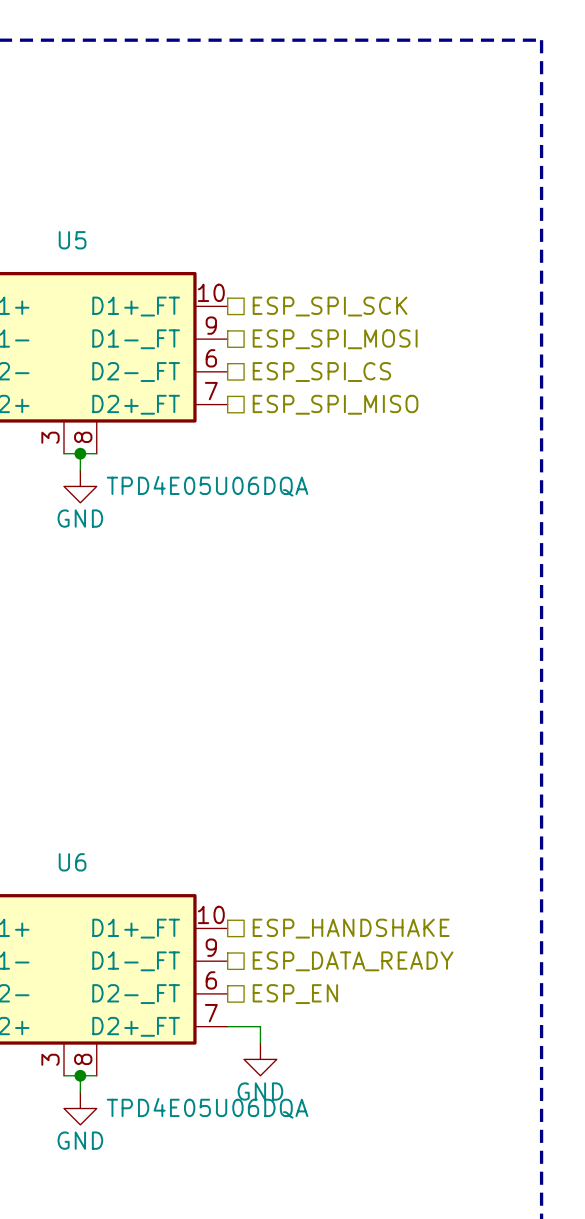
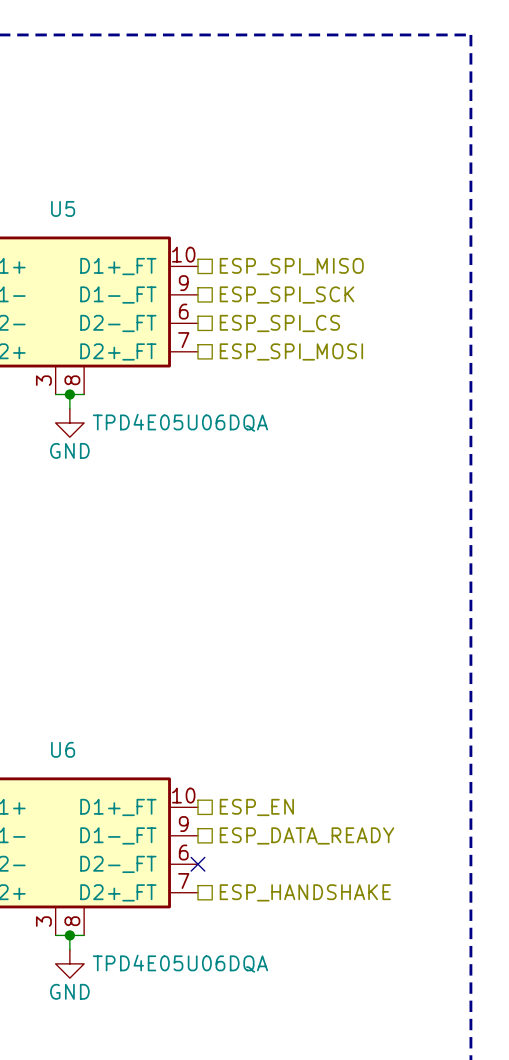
hierarchical label: ESP_SPI_SCK (330, 306) -> ESP_SPI_MISO (291, 266)
hierarchical label: ESP_SPI_MOSI (335, 339) -> ESP_SPI_SCK (287, 295)
hierarchical label: ESP_SPI_MISO (335, 404) -> ESP_SPI_MOSI (291, 351)
hierarchical label: ESP_HANDSHAKE (351, 928) -> ESP_EN (256, 807)
no-connect mark: none -> (197, 864)
hierarchical label: ESP_EN (295, 994) -> none
wire: (227, 1026) (260, 1026) (260, 1043) -> none
hierarchical label: none -> ESP_HANDSHAKE (305, 892)
power symbol: GND (260, 1059) -> none

